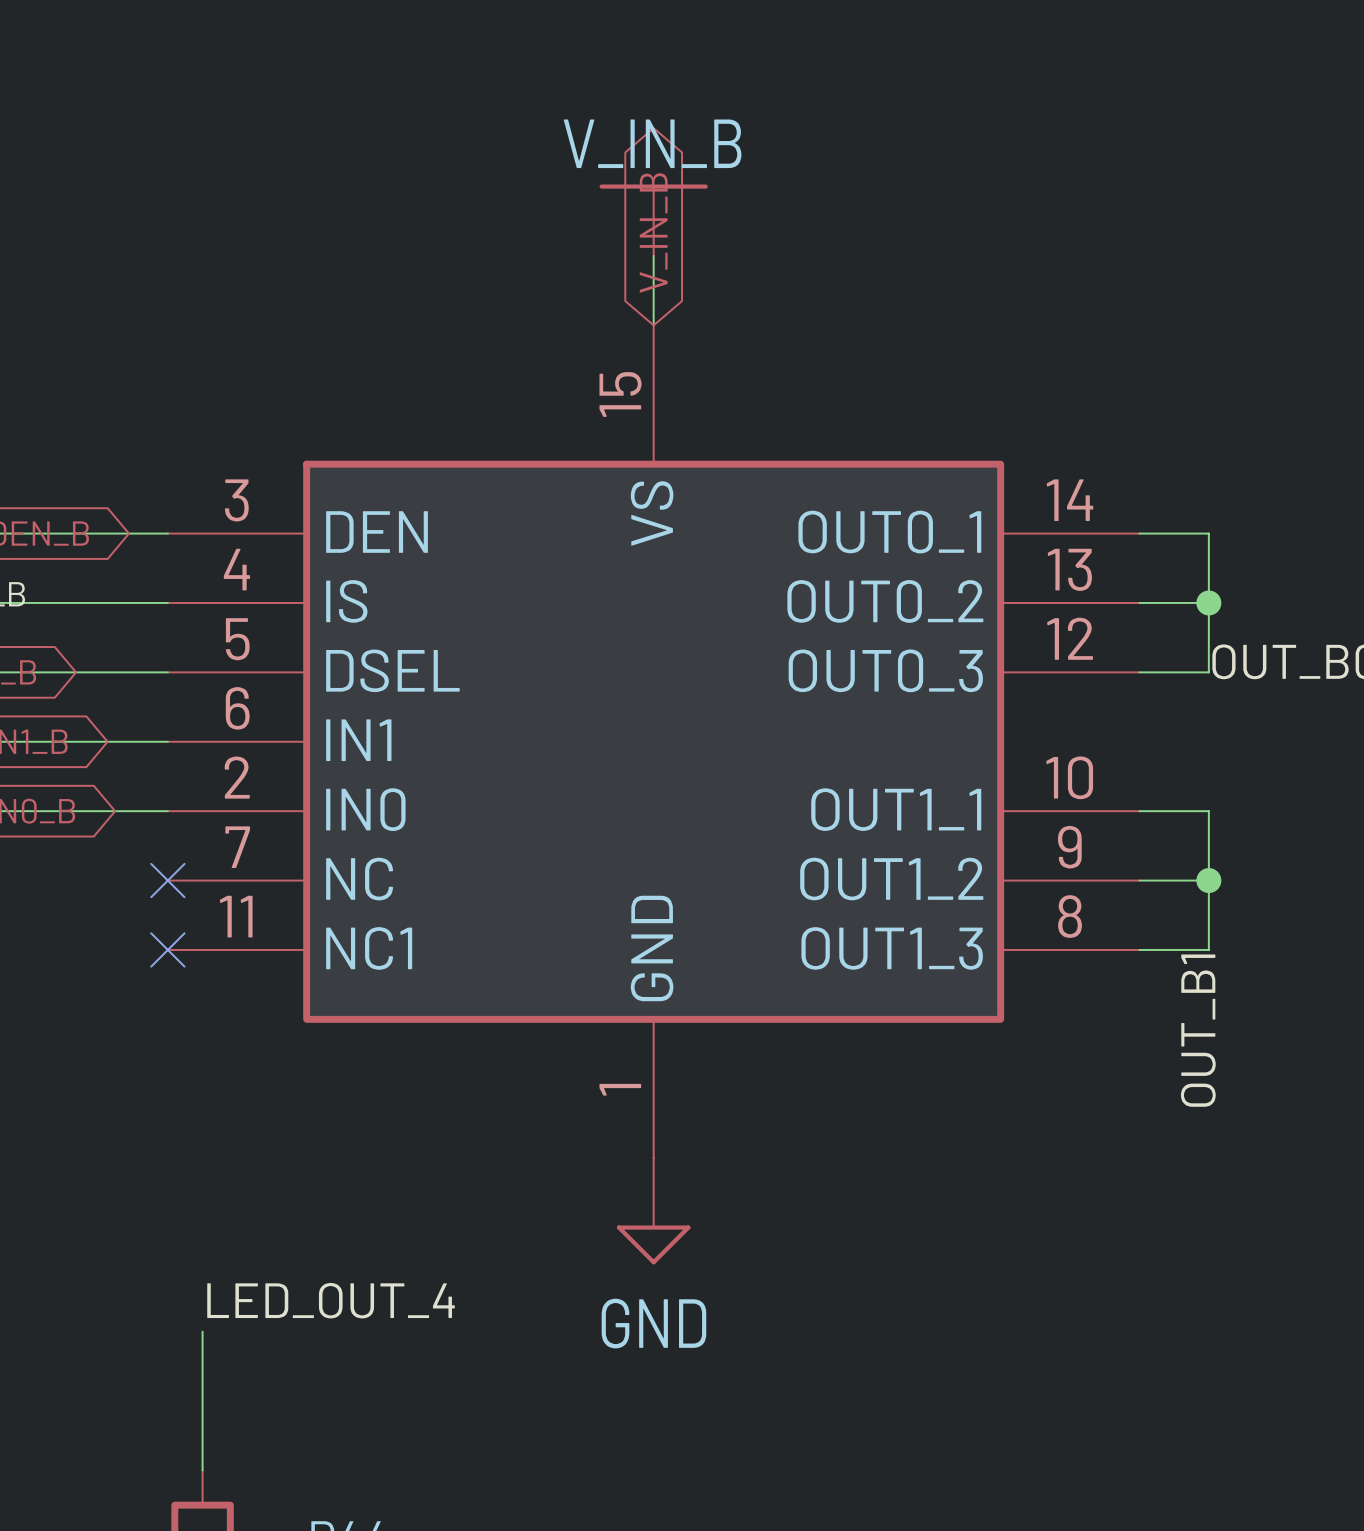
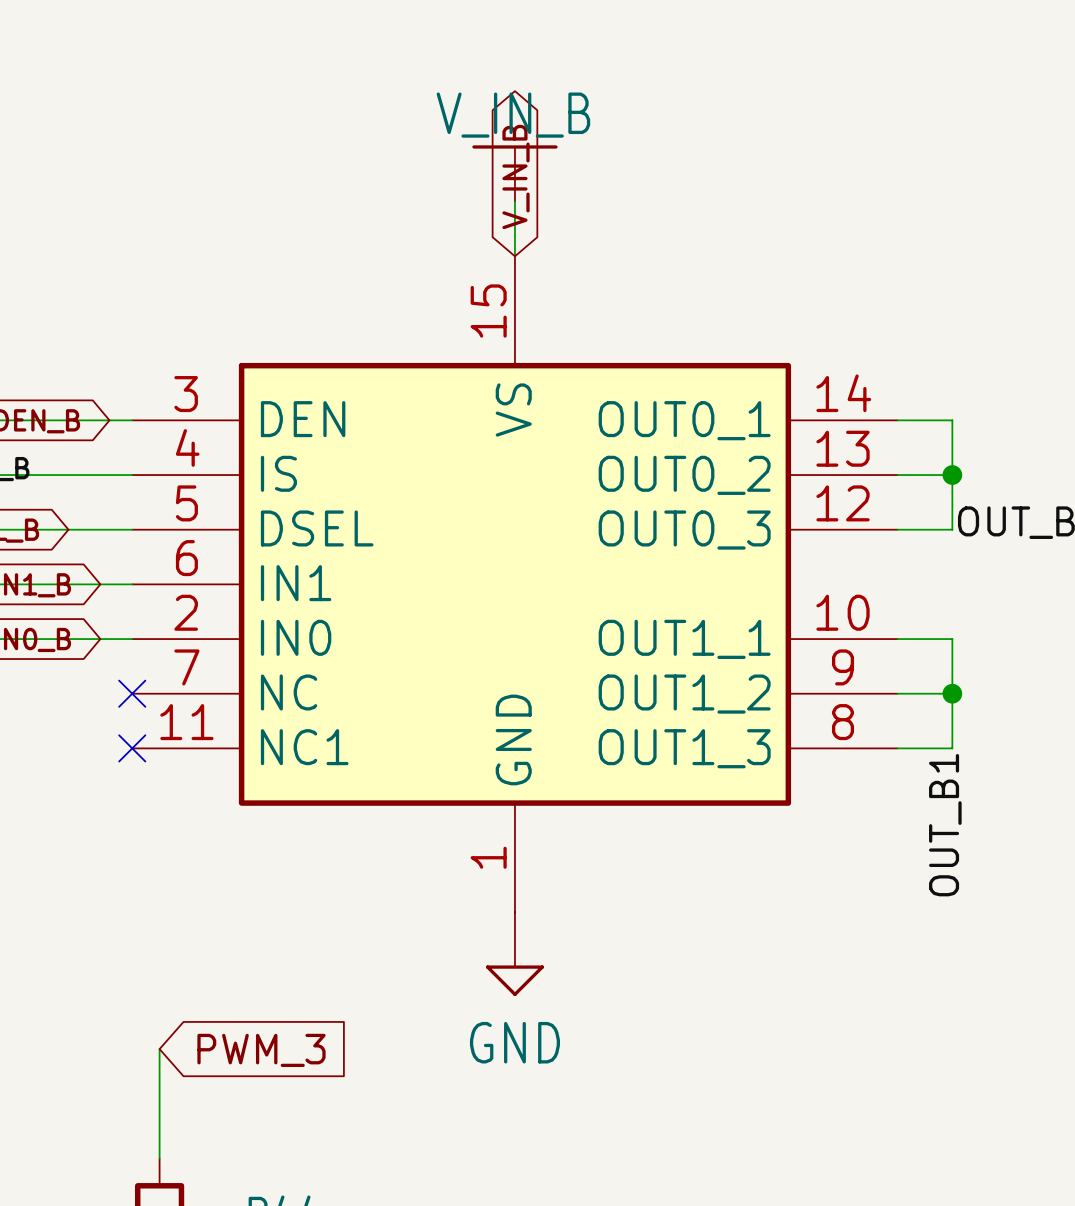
label: LED_OUT_4 (331, 1300) -> none
global label: none -> PWM_3 (261, 1050)

